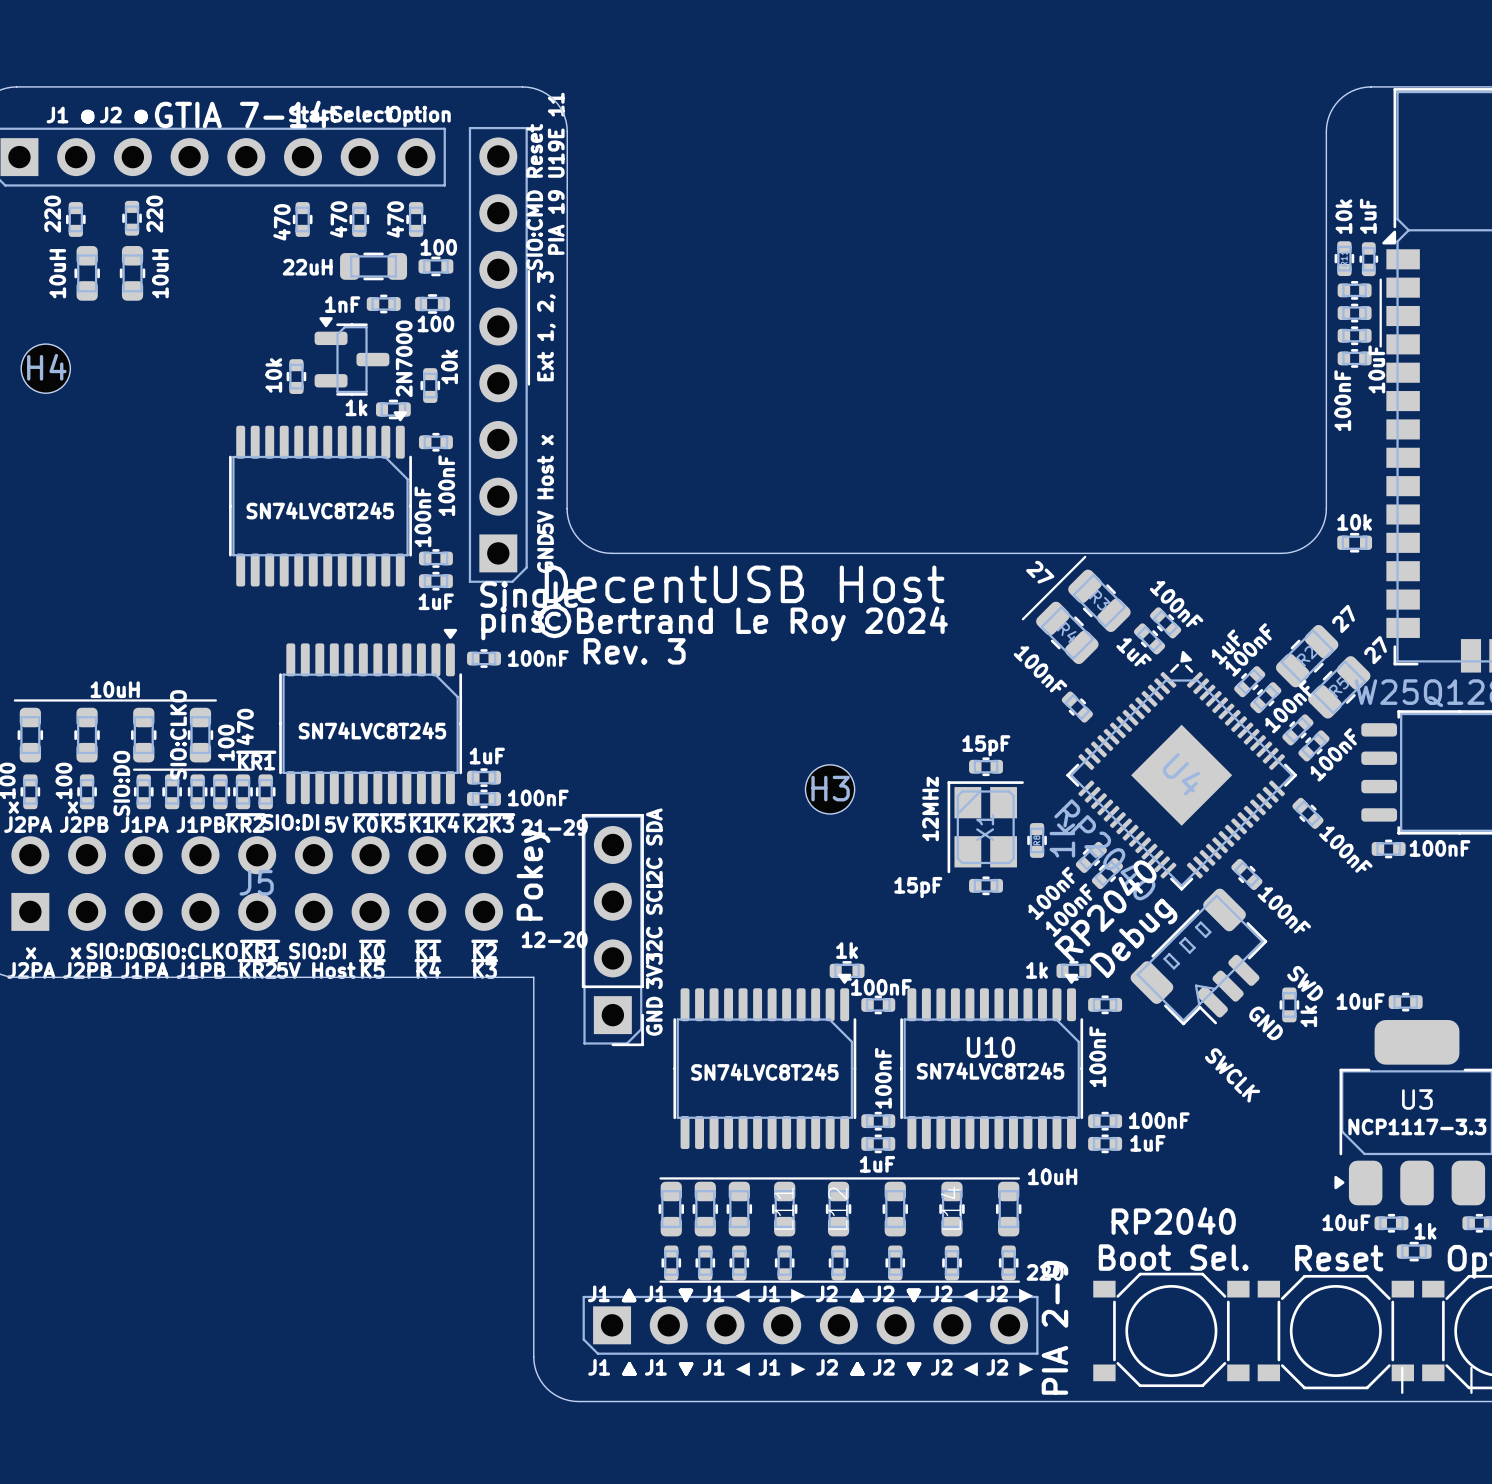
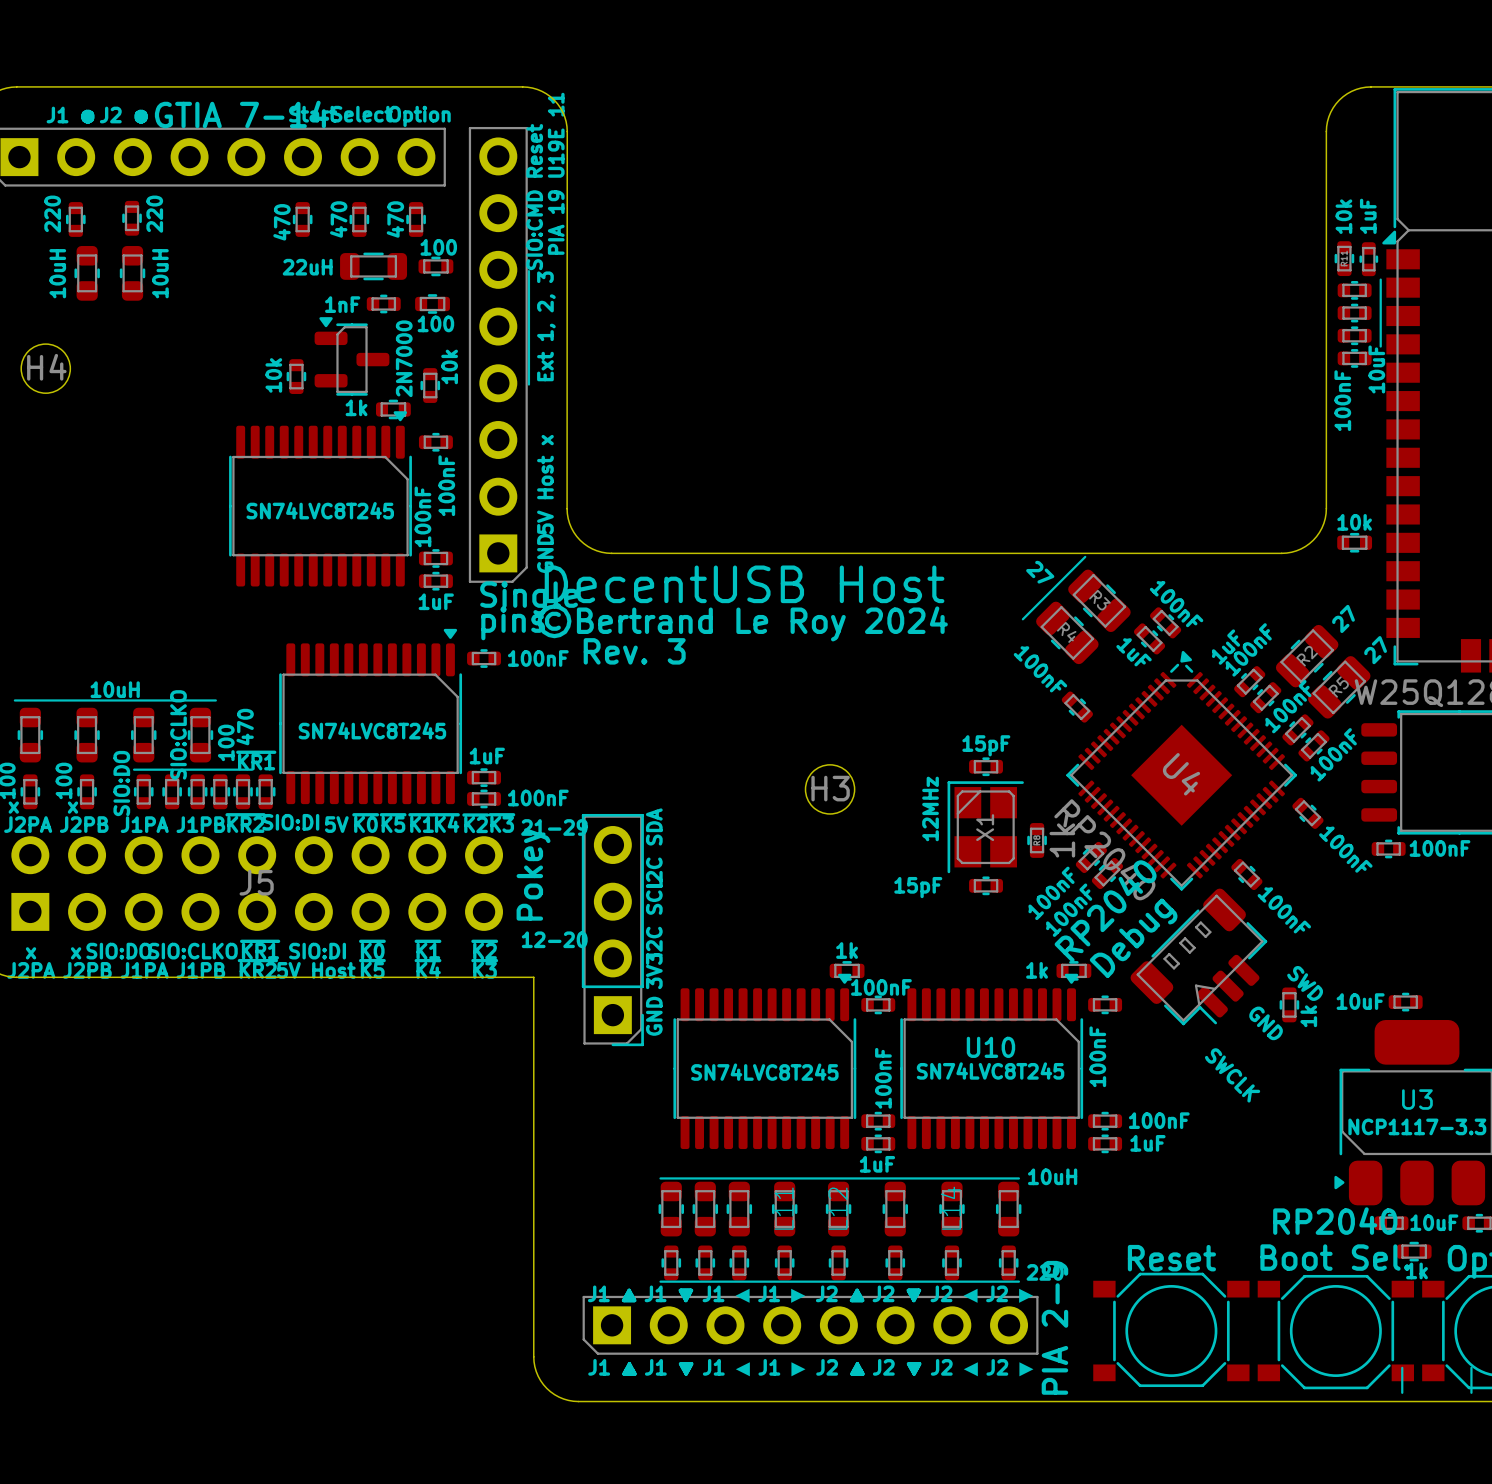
text: RP2040 (1173, 1221) -> Reset (1171, 1258)
part value position: 10uF (1346, 1222) -> 10uF (1434, 1222)
part value position: 1k (1425, 1231) -> 1k (1417, 1270)
text position: Boot Sel. (1173, 1257) -> Boot Sel. (1335, 1257)
text: Reset (1339, 1258) -> RP2040 (1335, 1221)

